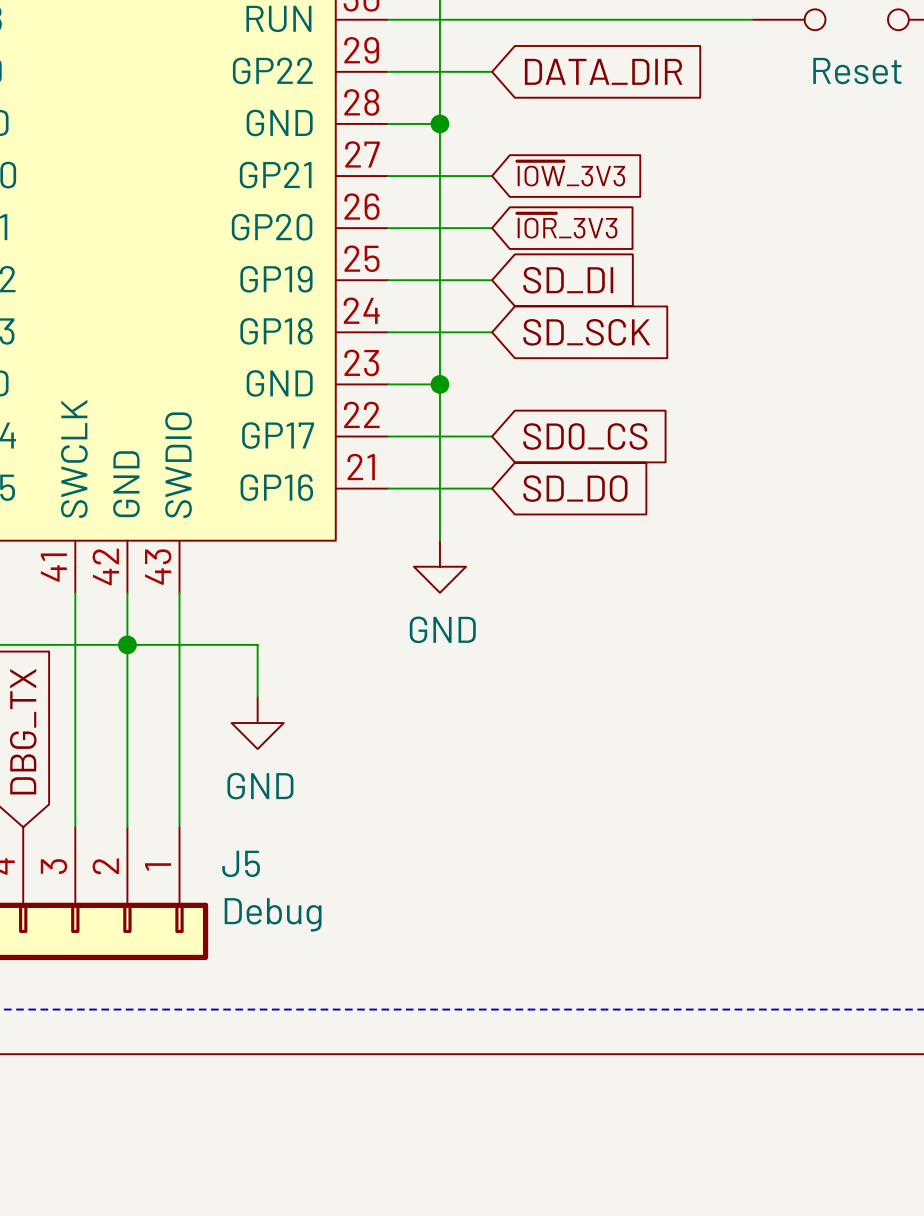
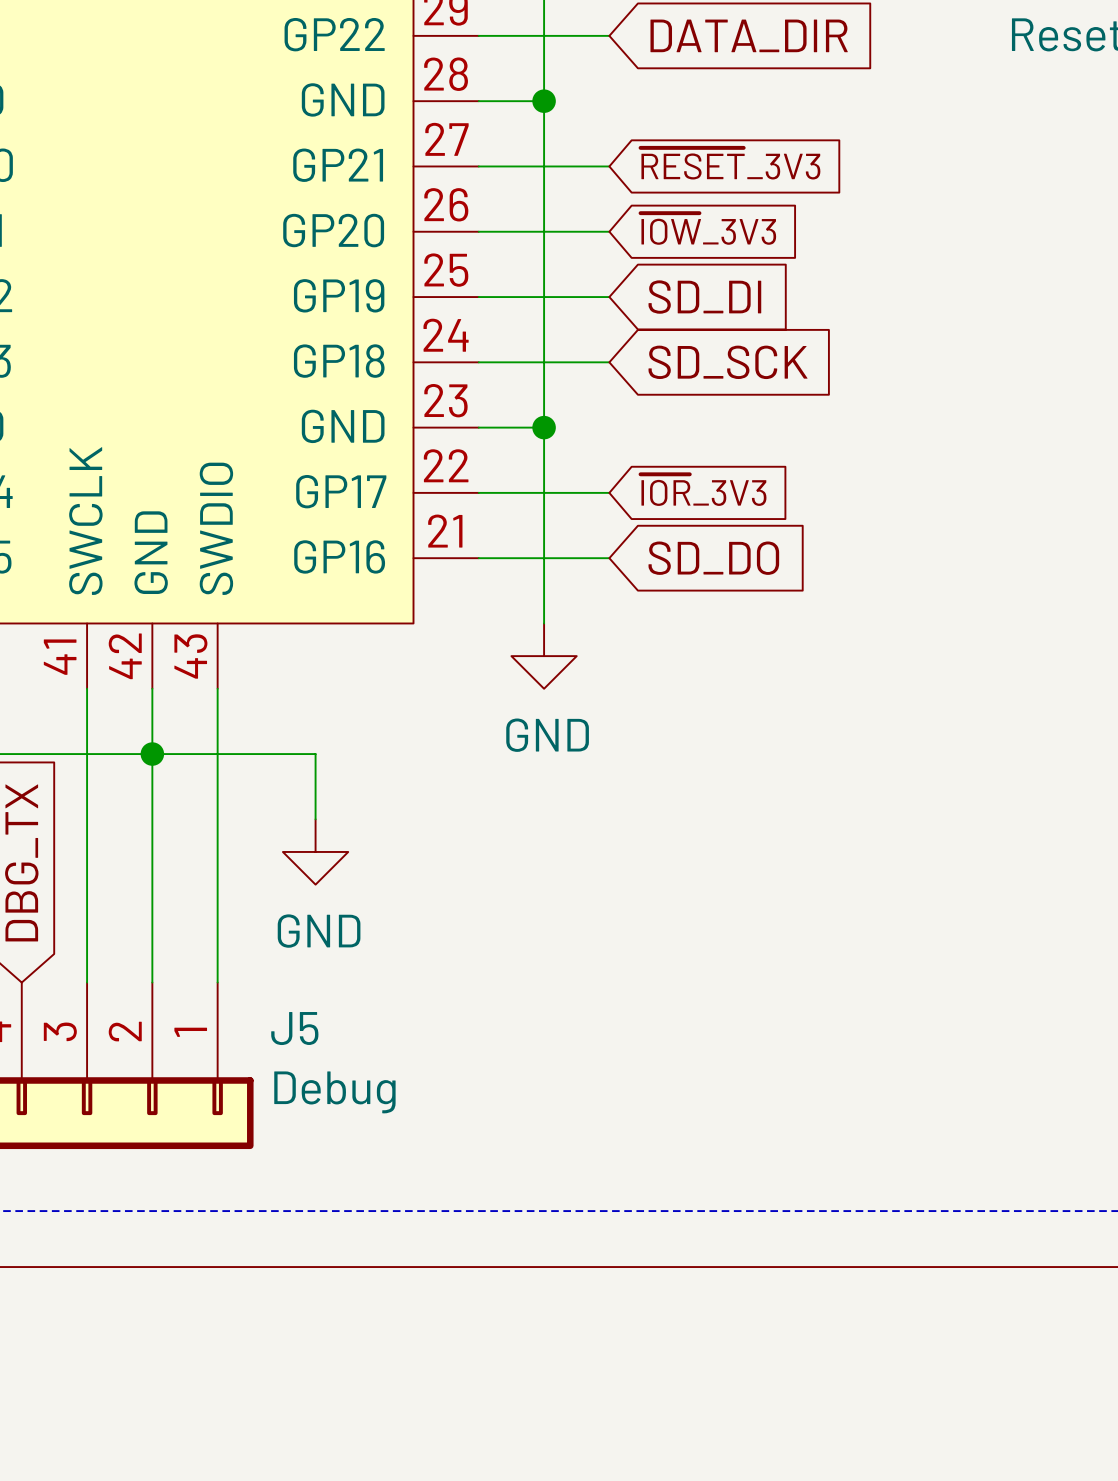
global label: ~{IOW}_3V3 (571, 173) -> ~{RESET}_3V3 (730, 163)
global label: ~{IOR}_3V3 (567, 225) -> ~{IOW}_3V3 (708, 228)
global label: SD0_CS (585, 436) -> ~{IOR}_3V3 (703, 490)

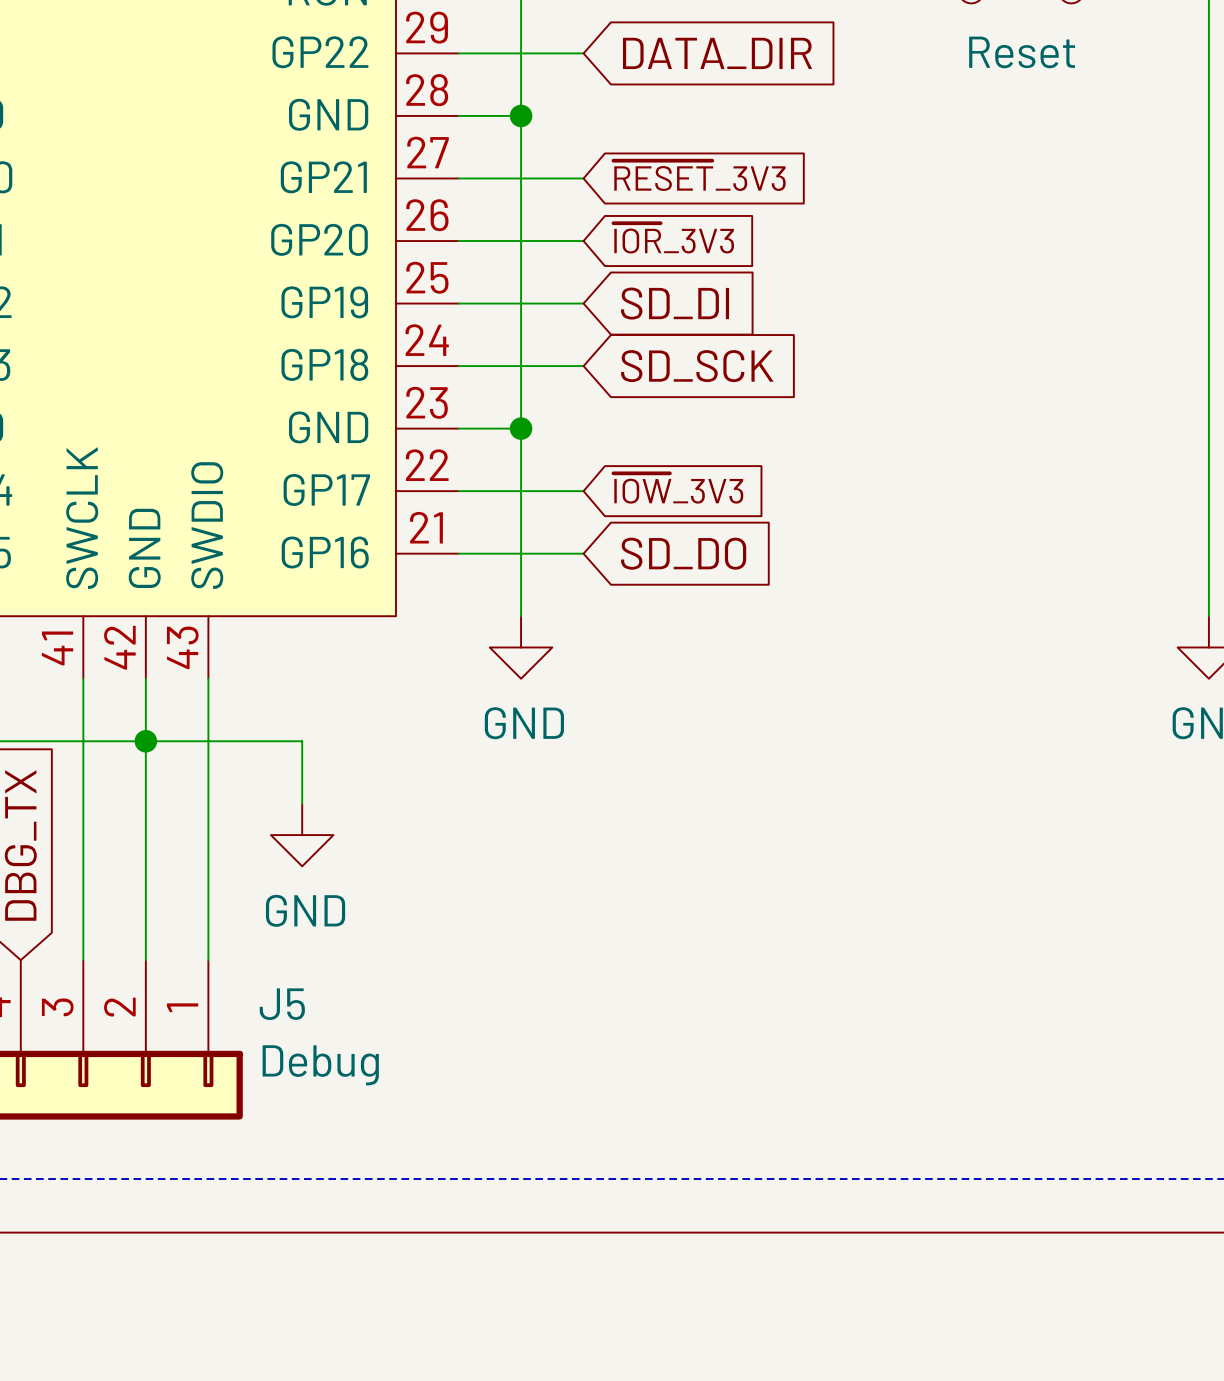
global label: ~{IOW}_3V3 (708, 228) -> ~{IOR}_3V3 (673, 238)
global label: ~{IOR}_3V3 (703, 490) -> ~{IOW}_3V3 (678, 488)

